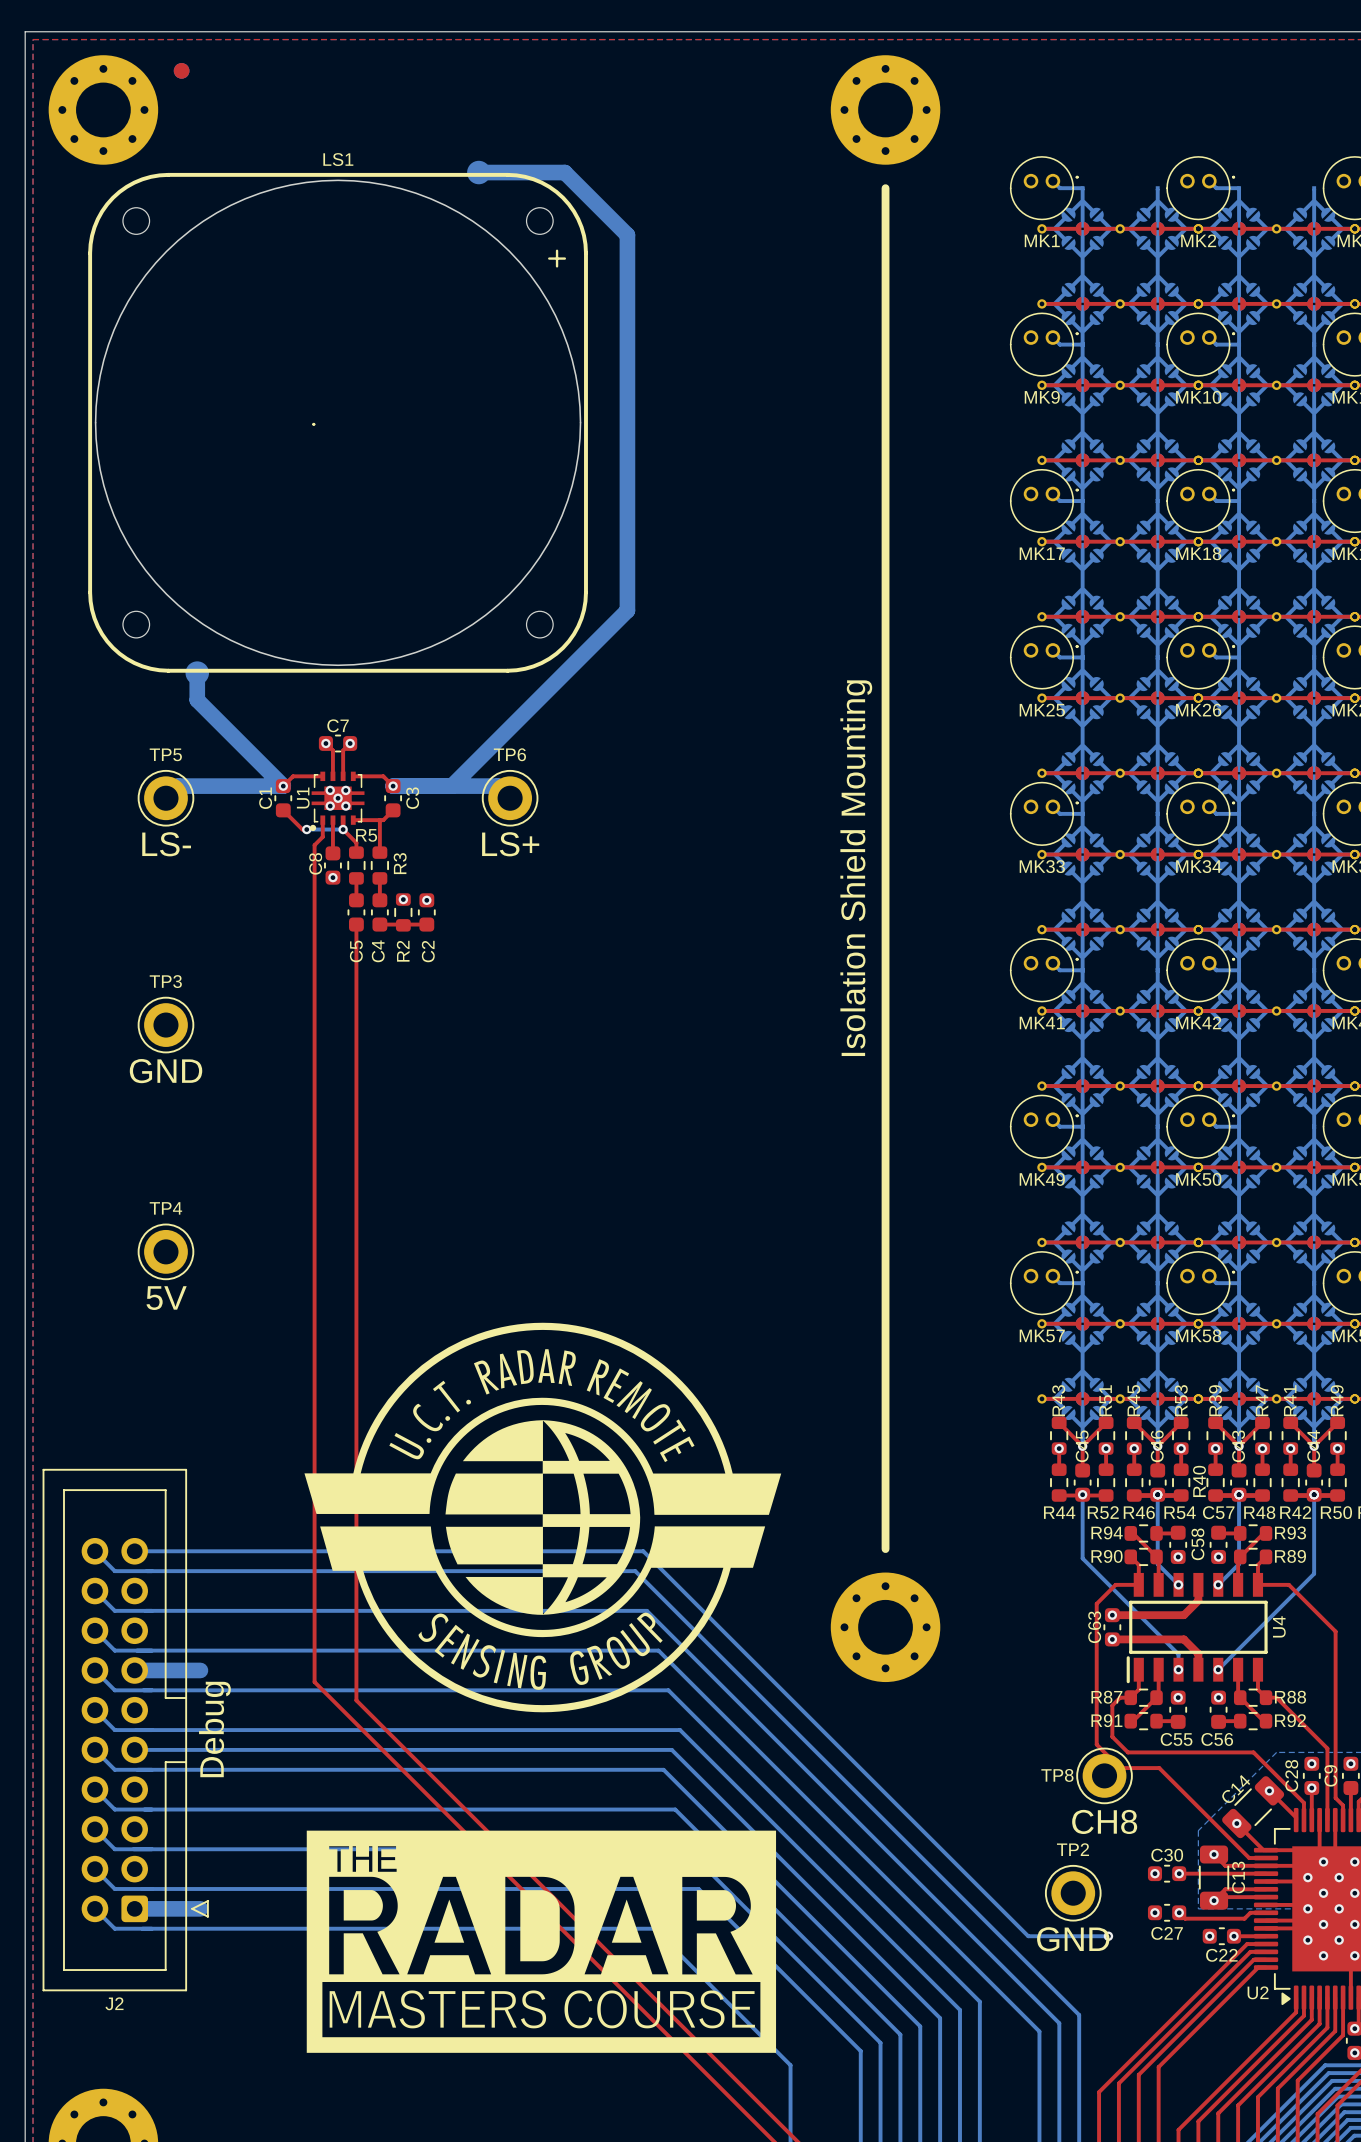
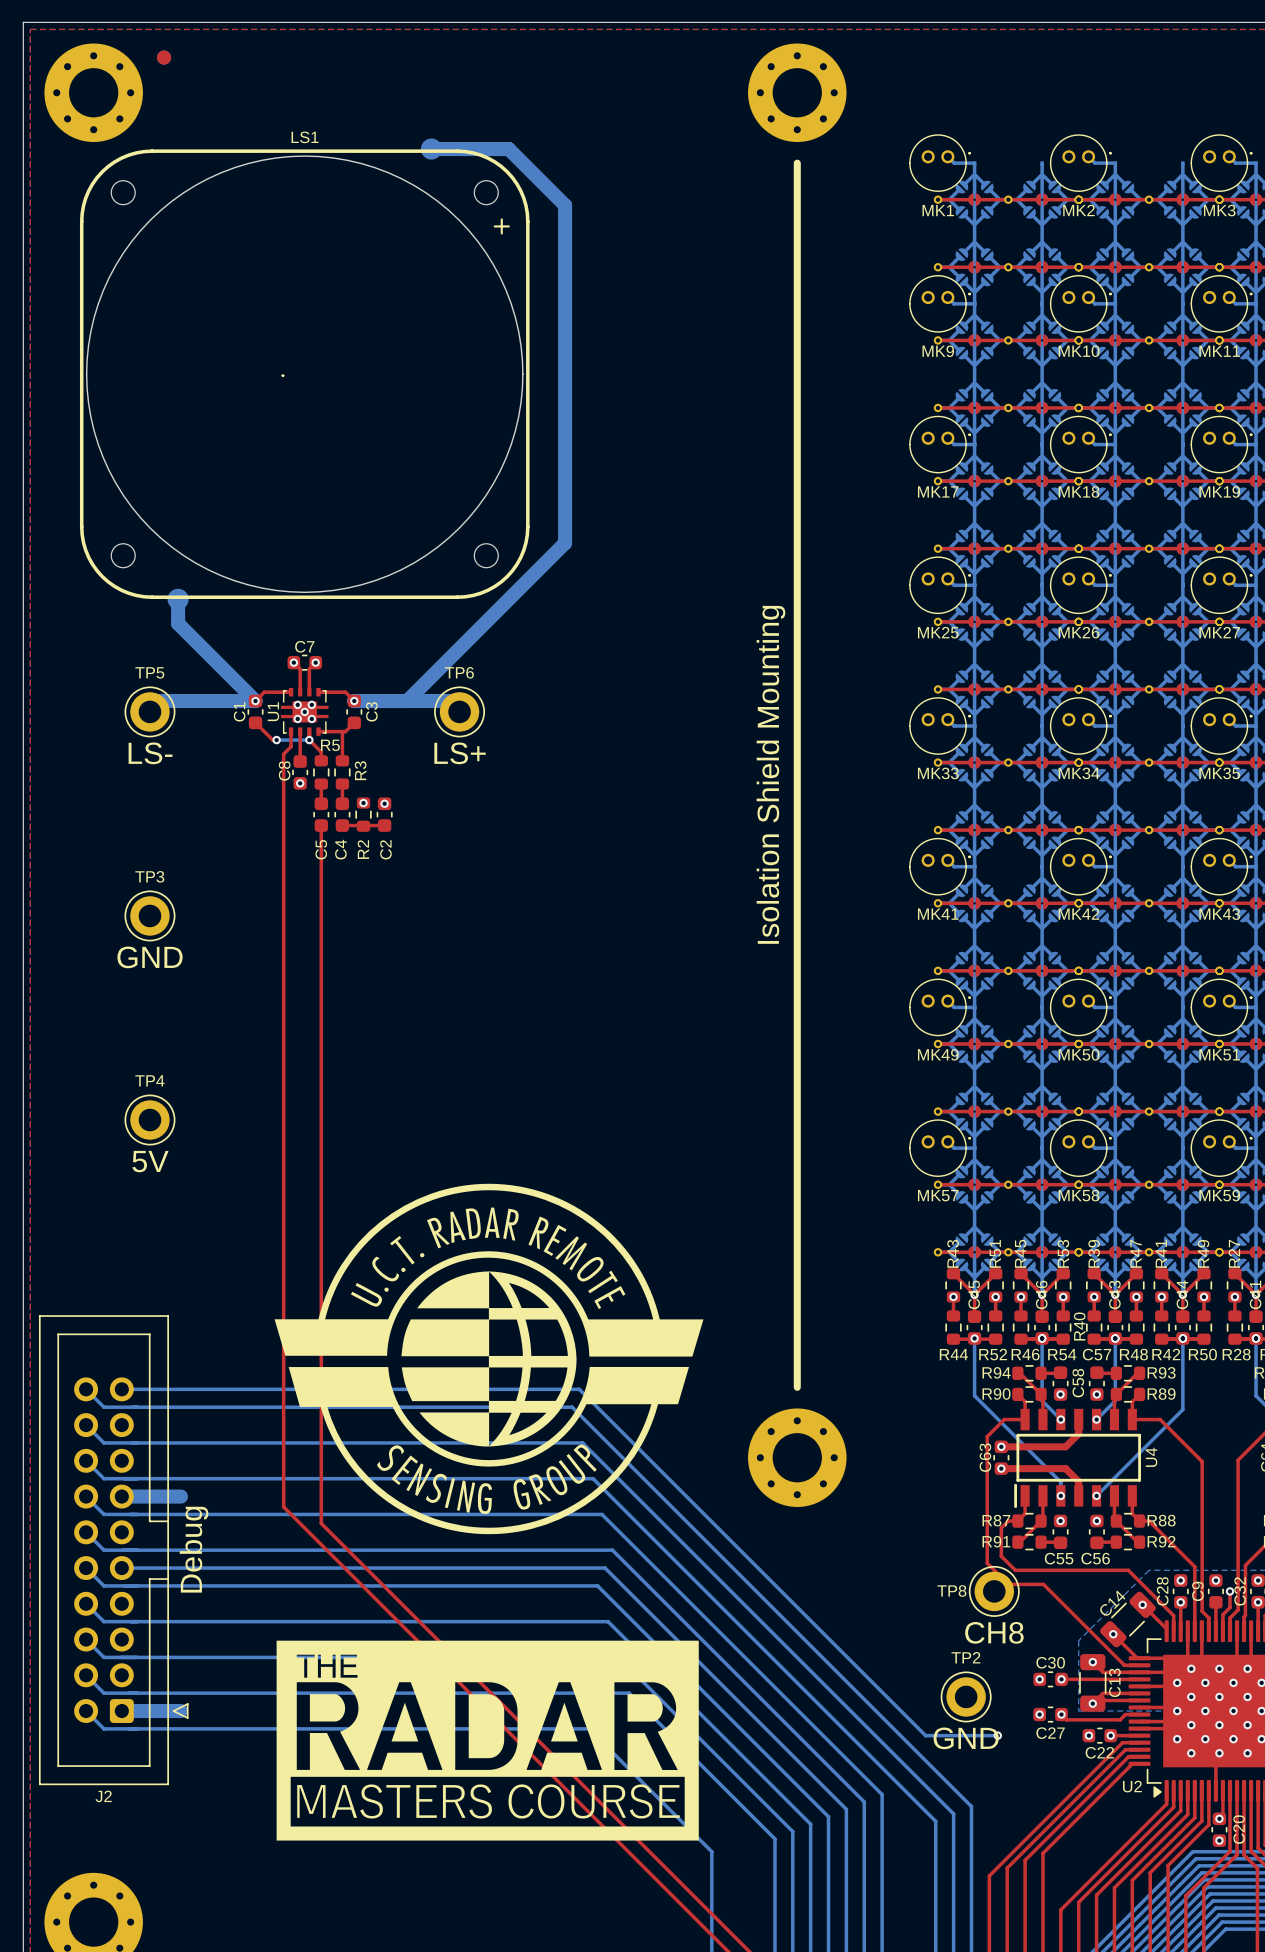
U1 footprint: [309, 771, 365, 832] -> [280, 688, 329, 736]

